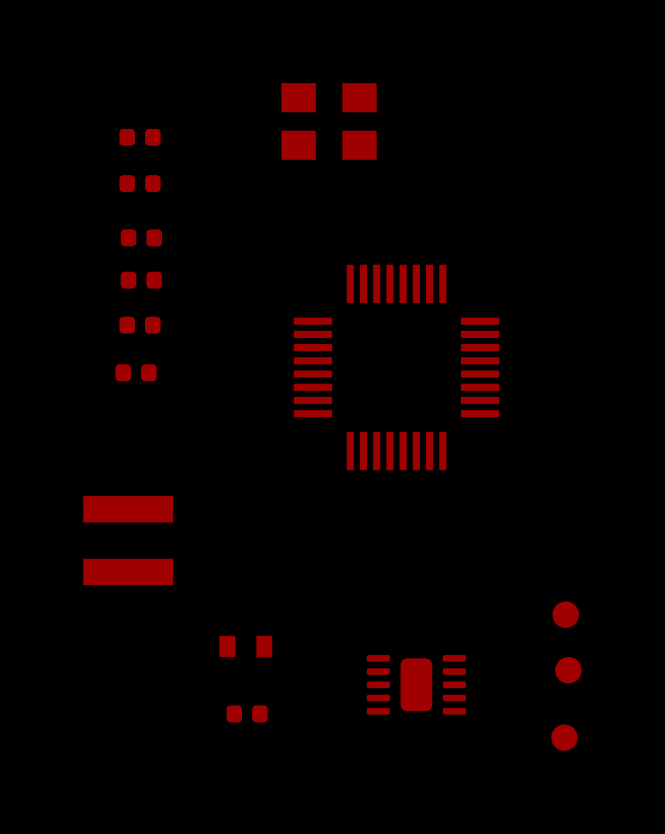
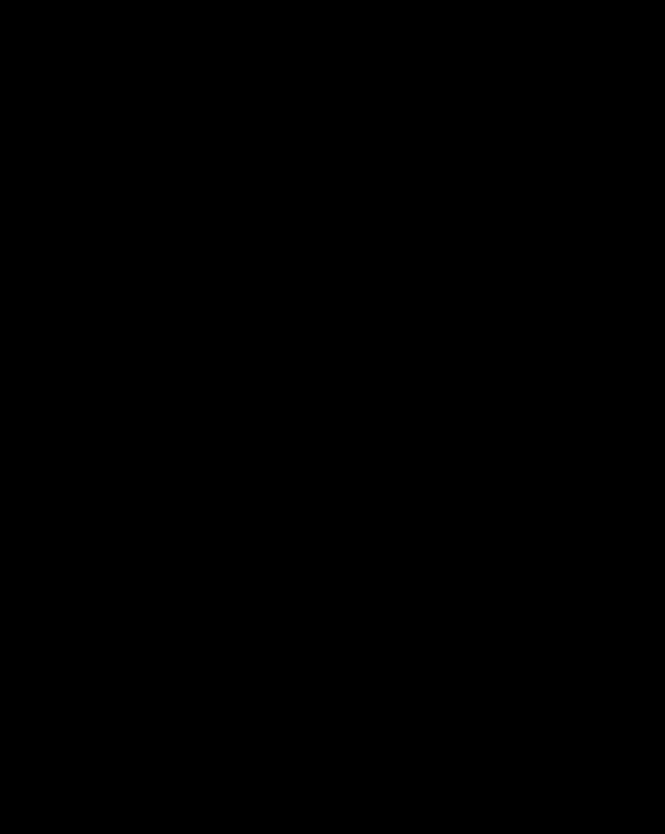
part: (329, 121) -> none
part: (140, 137) -> none
part: (140, 183) -> none
part: (141, 237) -> none
part: (141, 280) -> none
part: (140, 325) -> none
part: (396, 367) -> none
part: (136, 372) -> none
part: (128, 540) -> none
part: (565, 614) -> none
part: (245, 646) -> none
part: (568, 670) -> none
part: (416, 684) -> none
part: (247, 713) -> none
part: (564, 737) -> none

